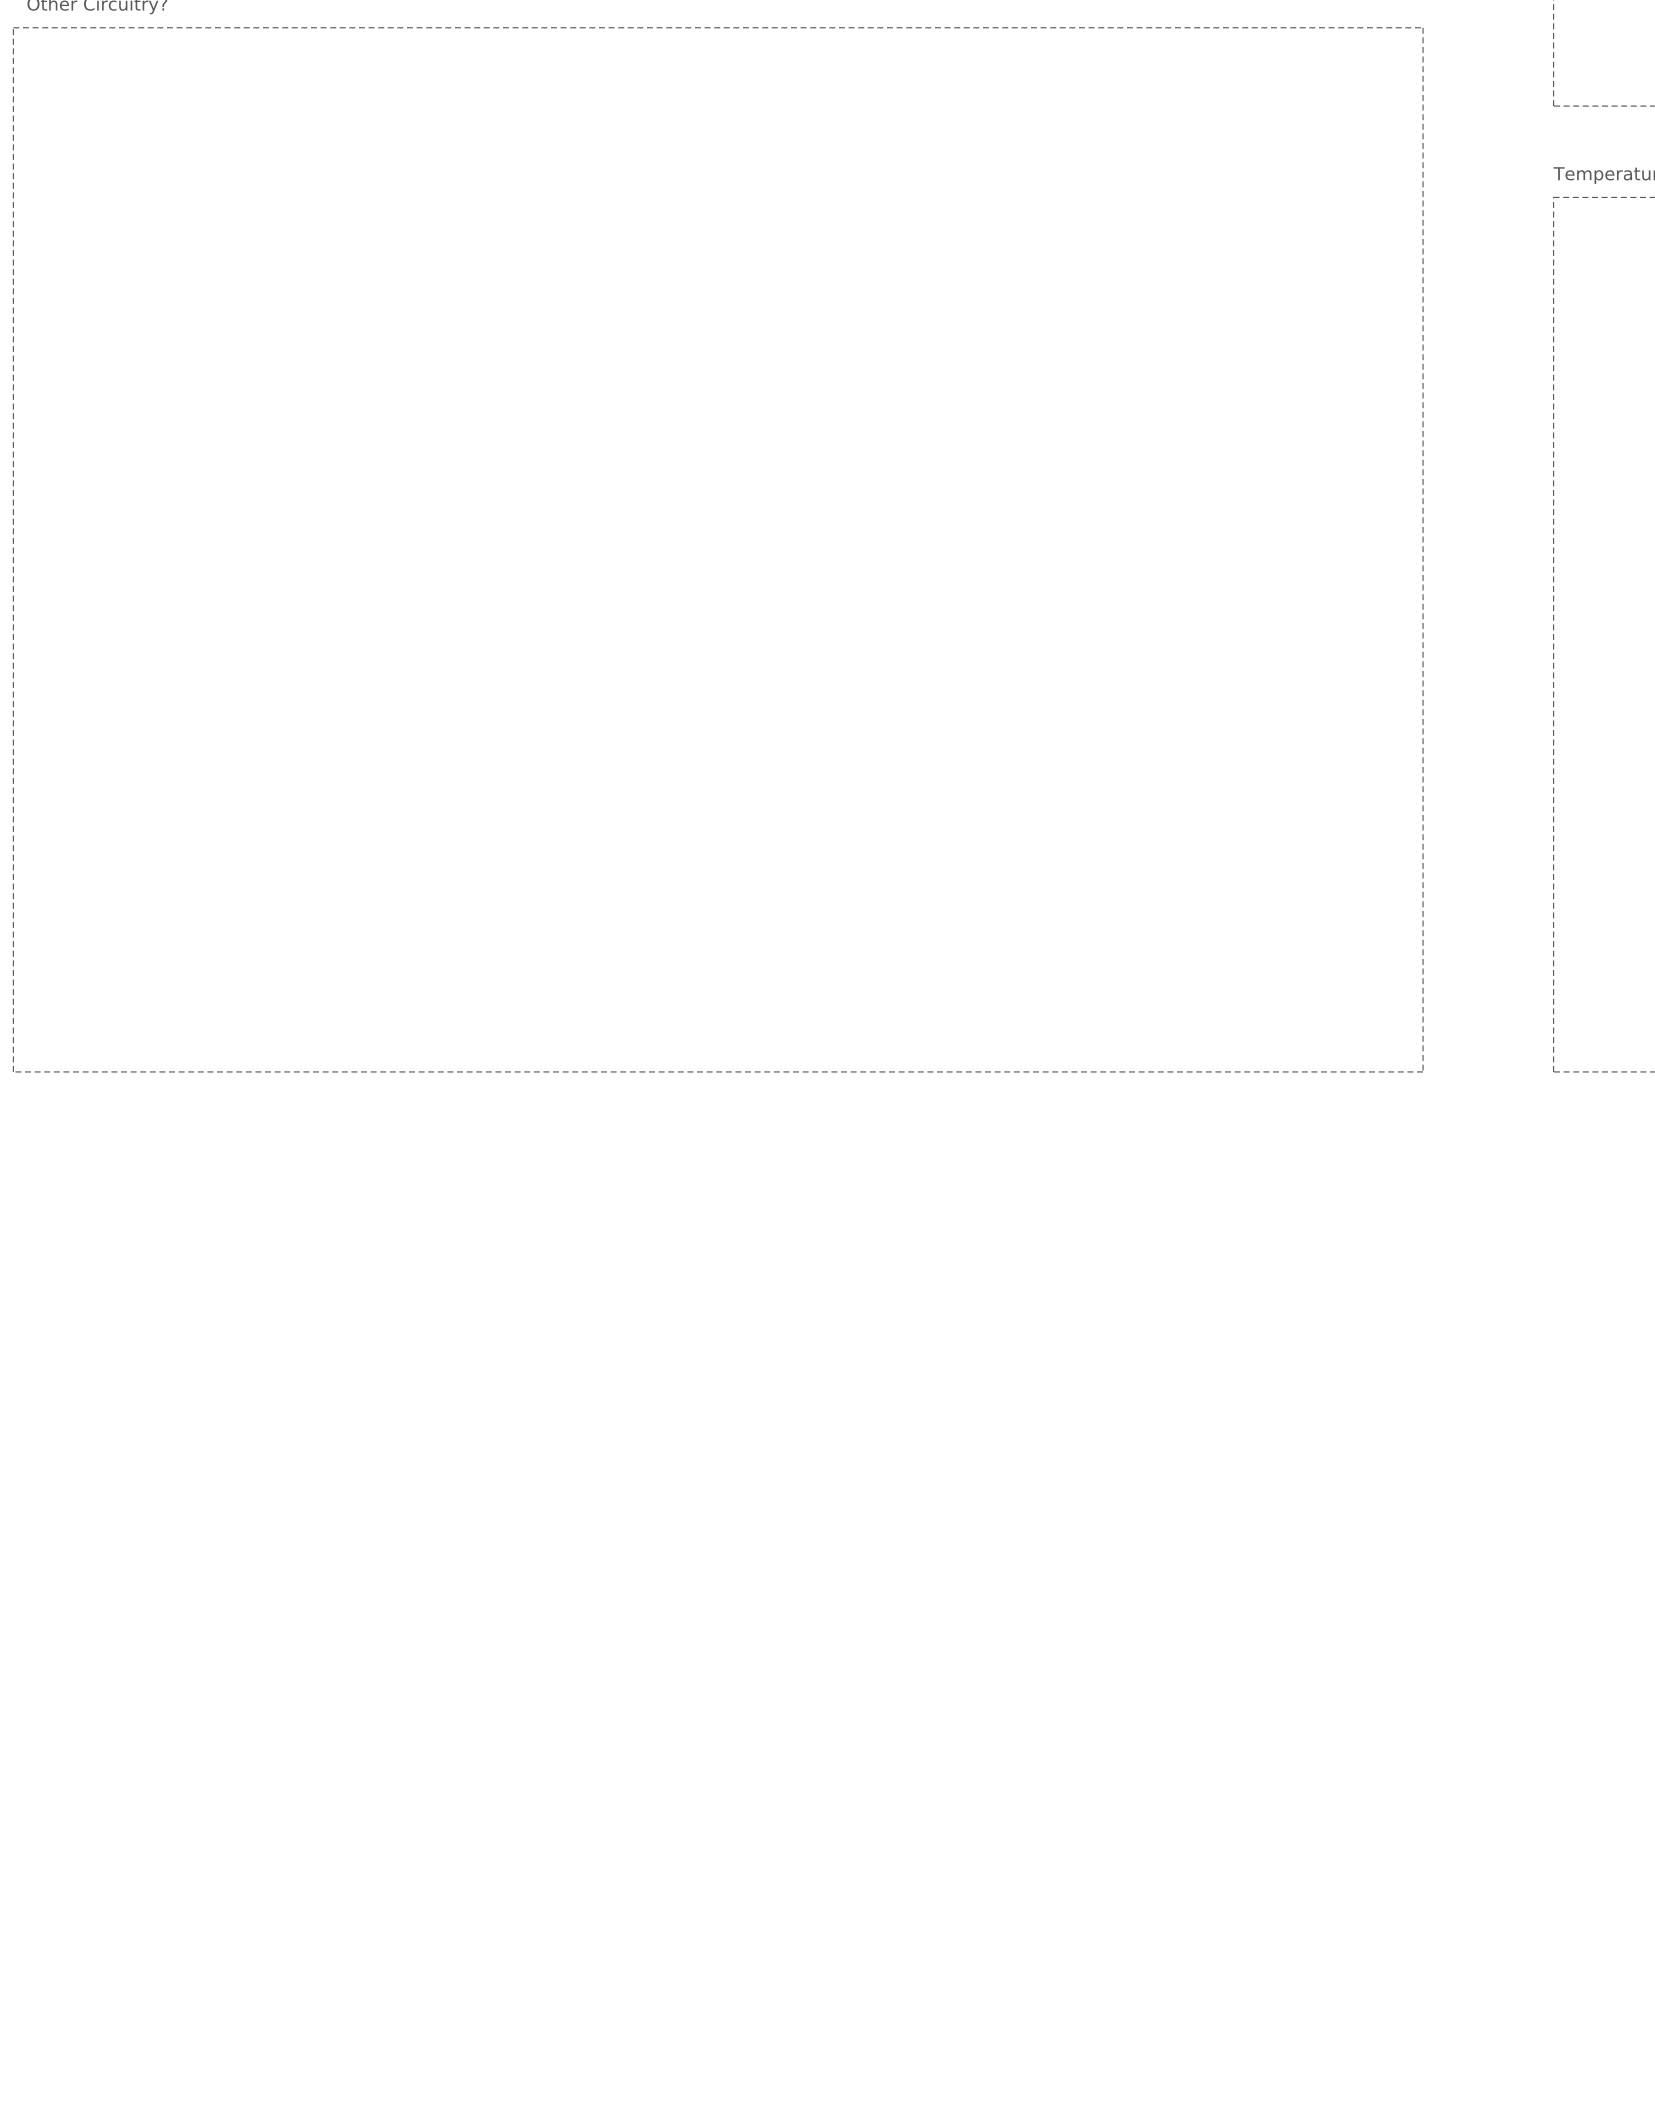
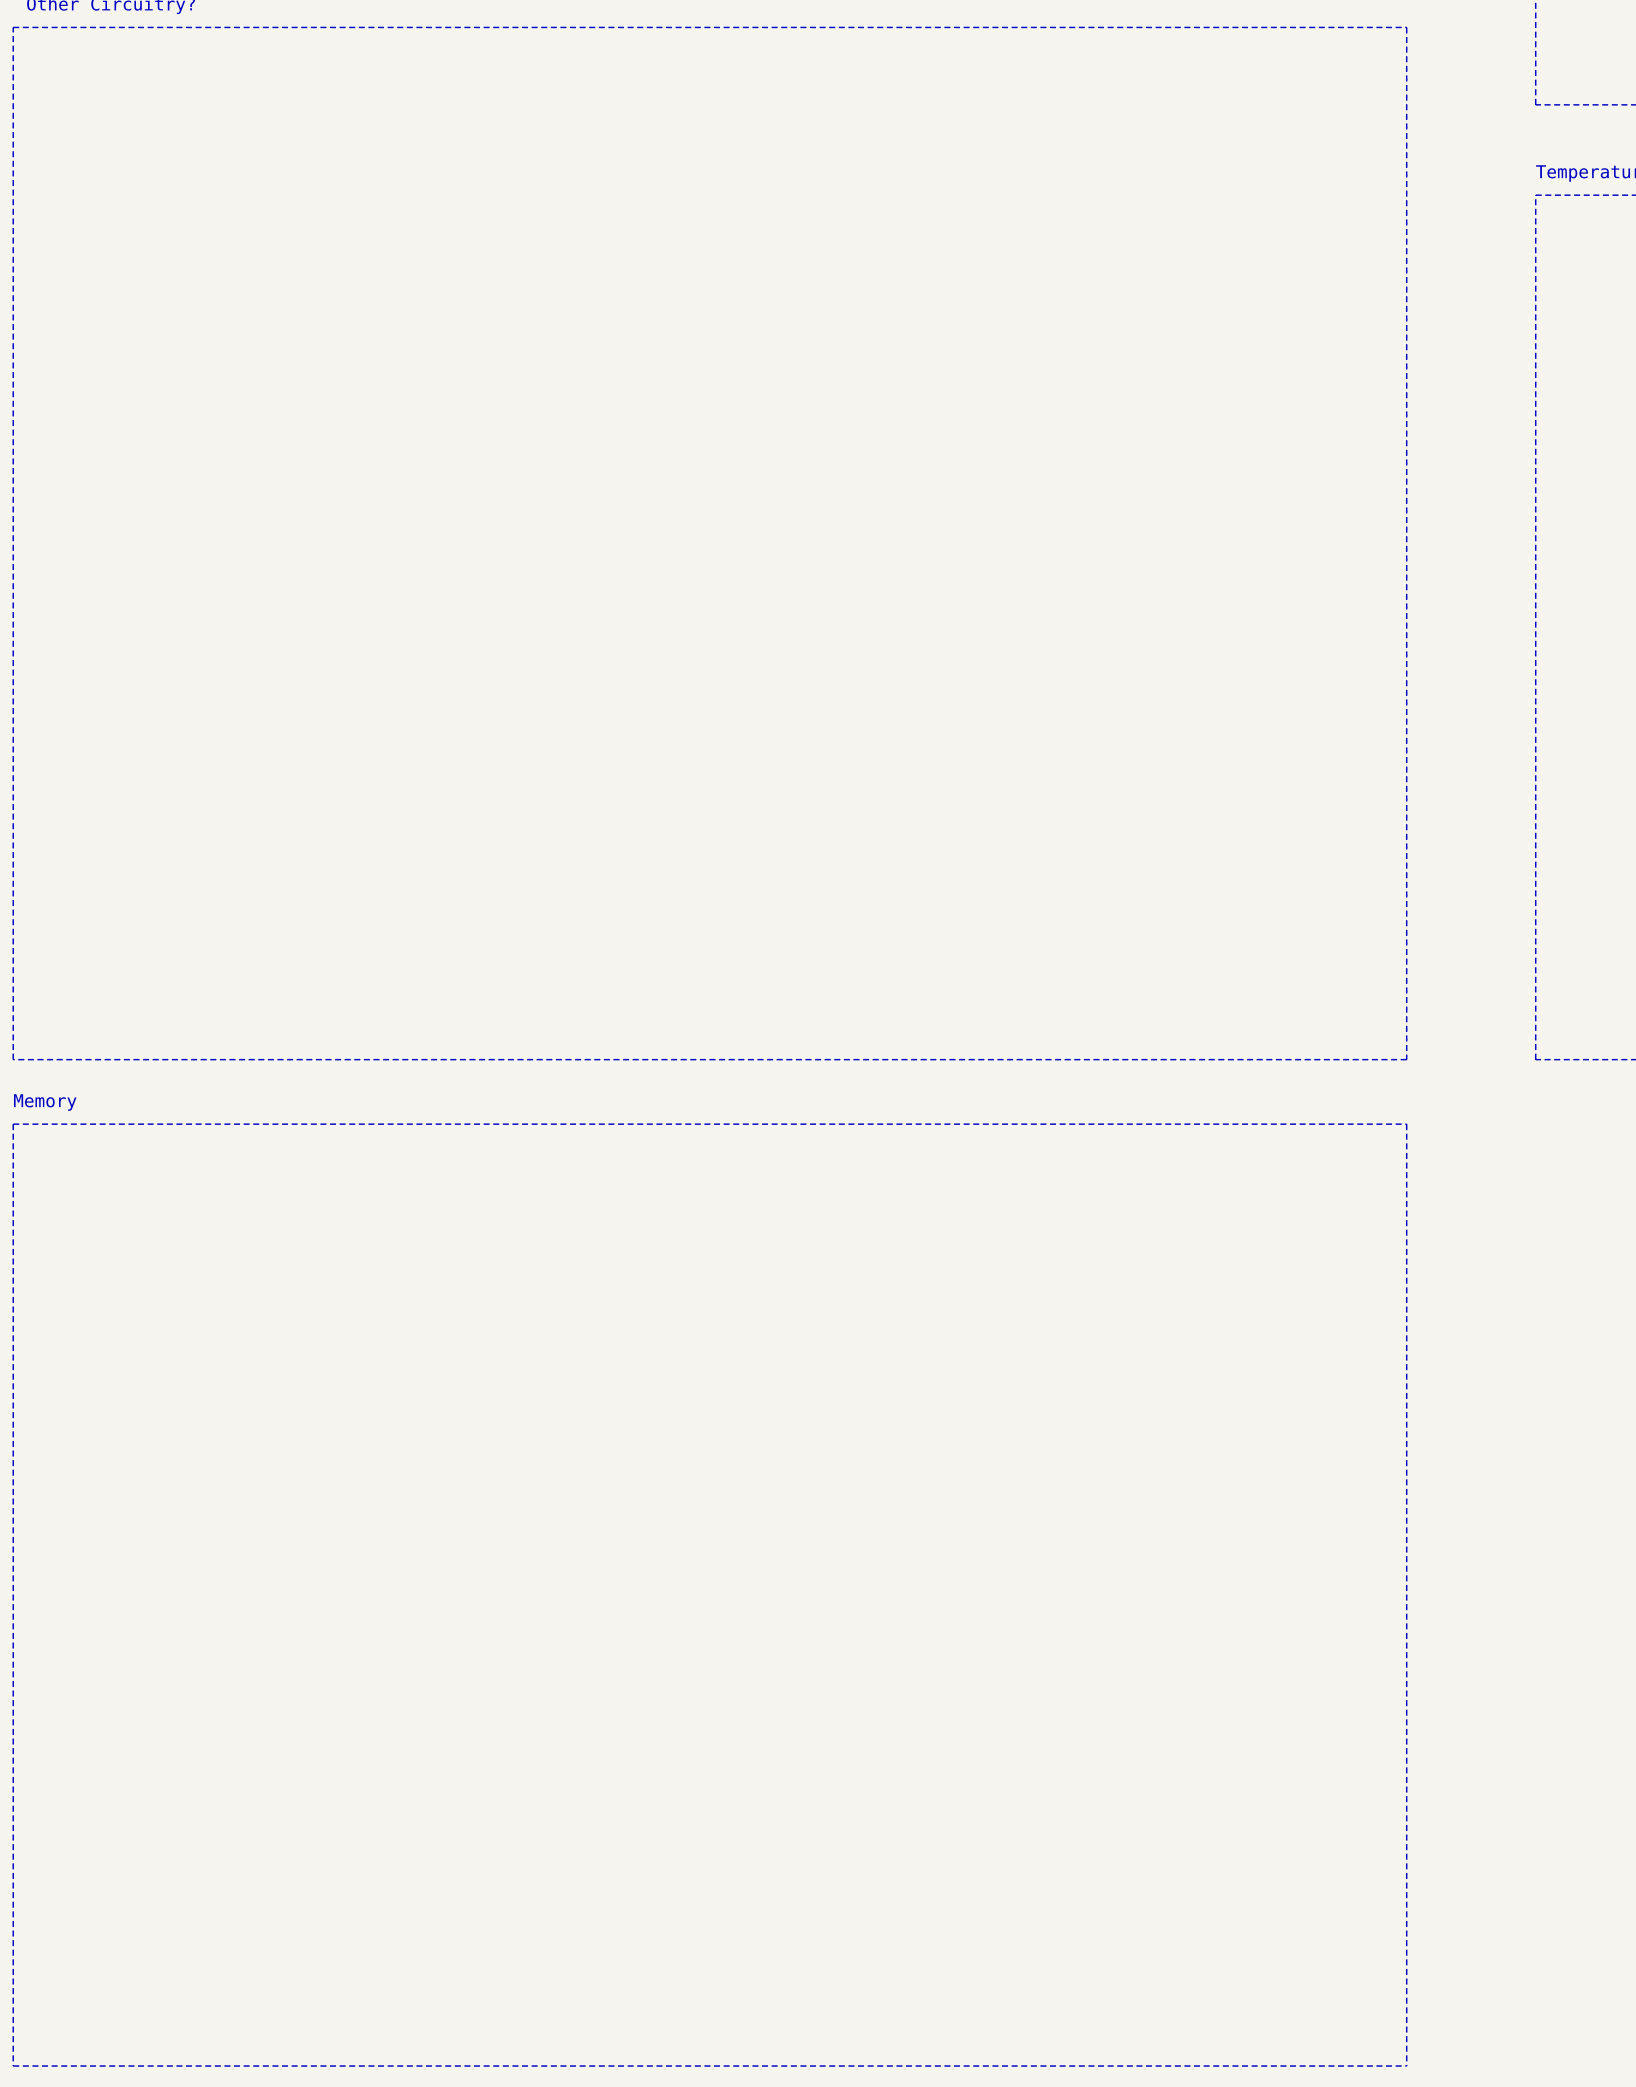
text: none -> Memory (45, 1102)
line: none -> (13, 1124) (1406, 1124) (1406, 2066) (13, 2066) (13, 1124)

